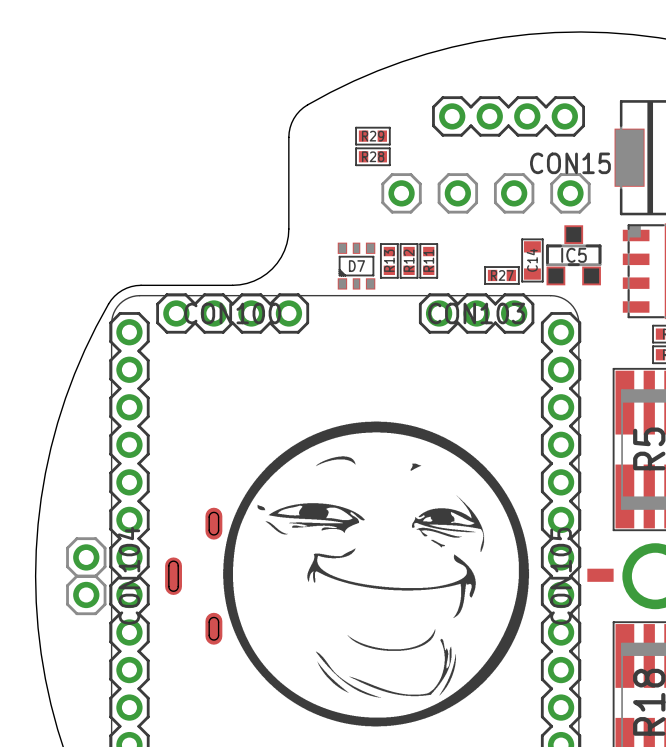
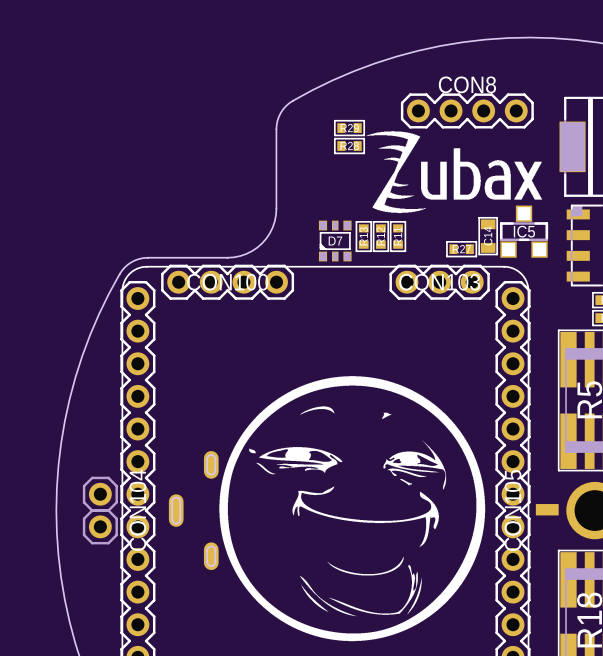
CON8 name: none -> CON8 (467, 84)
drawing: none -> [366, 131, 543, 214]
part: (401, 193) -> none
part: (457, 193) -> none
part: (514, 193) -> none
CON15: (570, 193) -> none

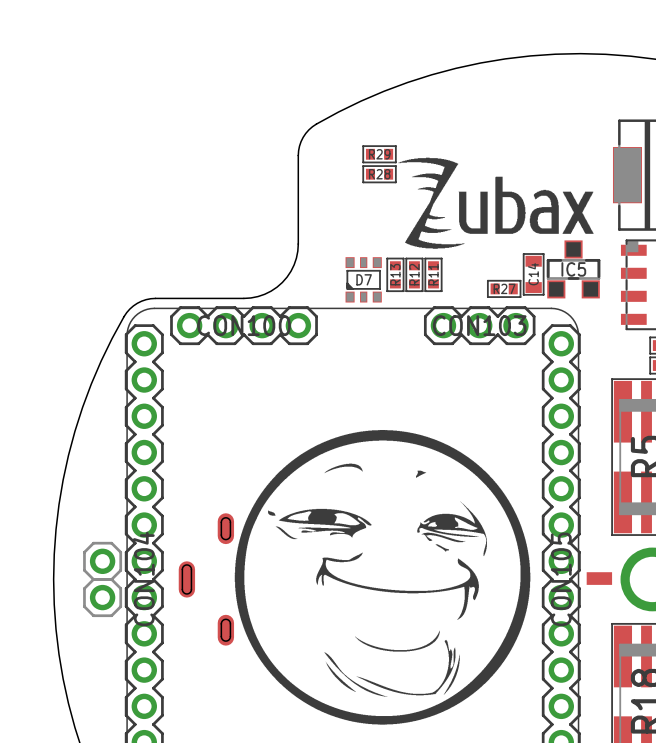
CON8: (467, 110) -> none

